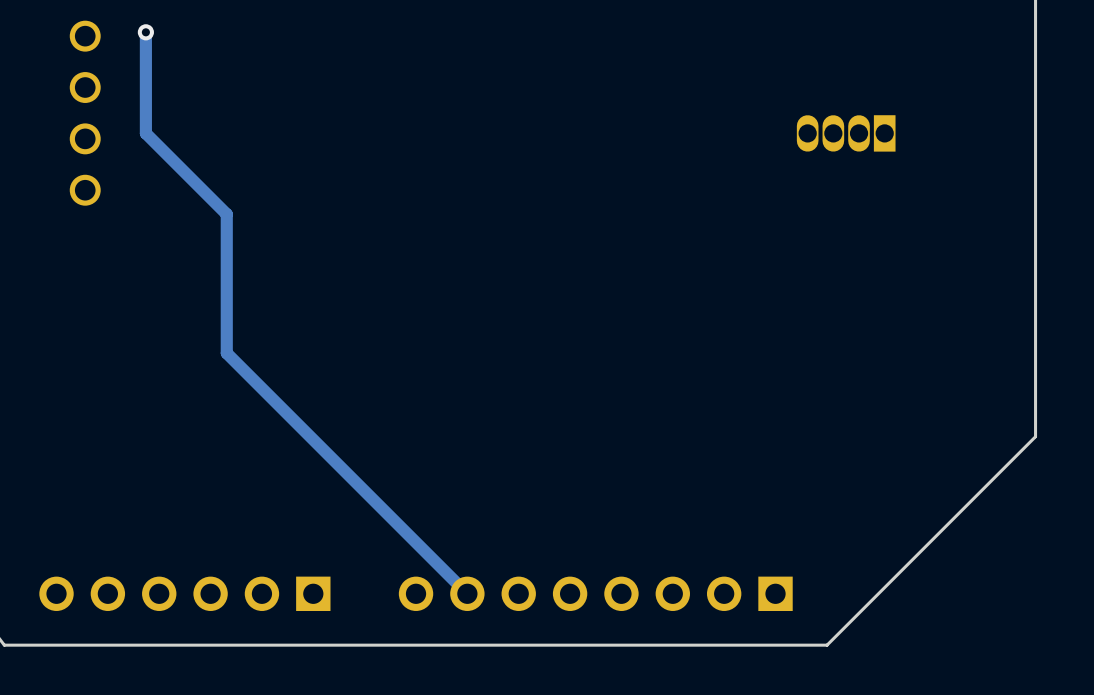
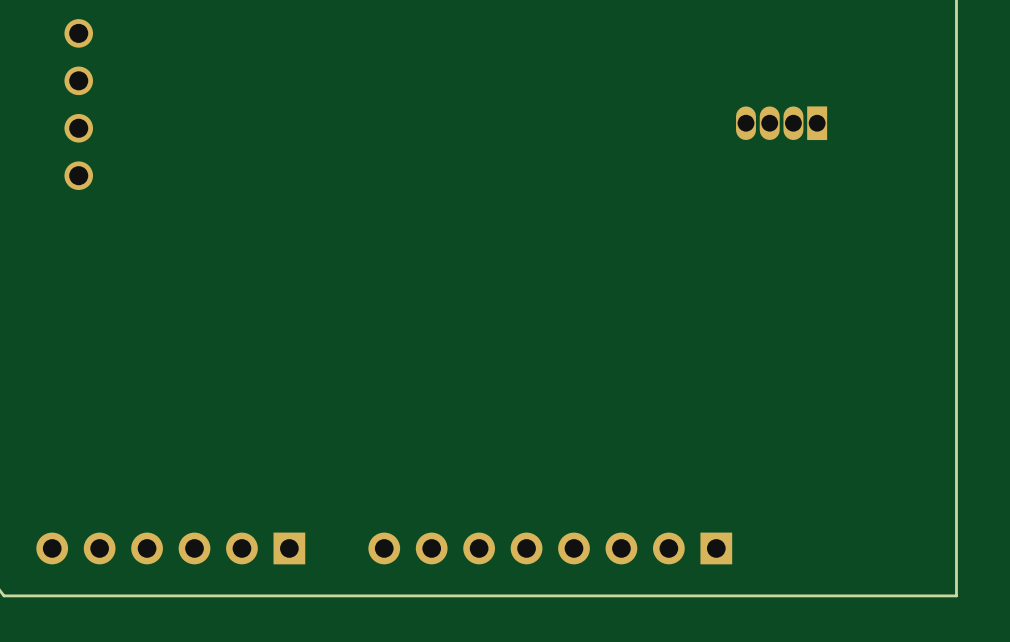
track: (145, 32) (145, 133) (226, 214) (226, 353) (467, 593) -> none
via: (145, 32) -> none
board edge: (1035, 436) (827, 645) -> (956, 403) (956, 595) (763, 595)

